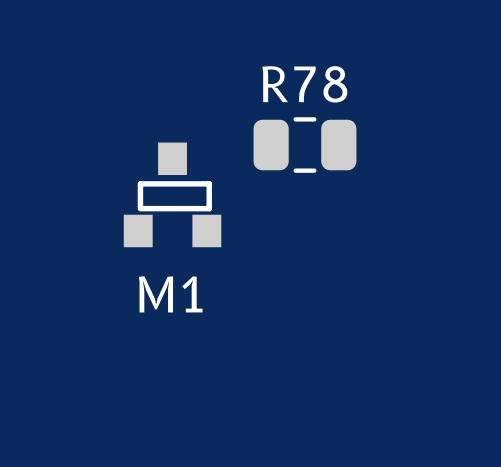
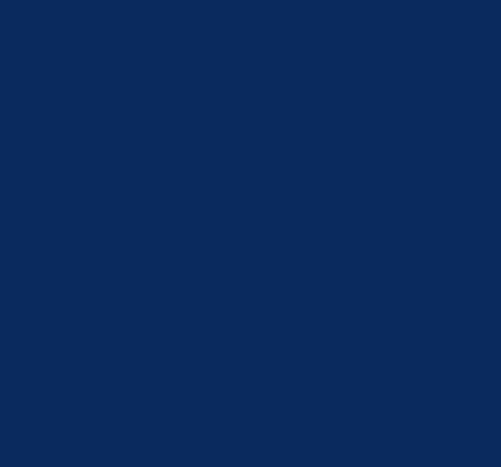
R78: (304, 145) -> none
M1: (172, 194) -> none

